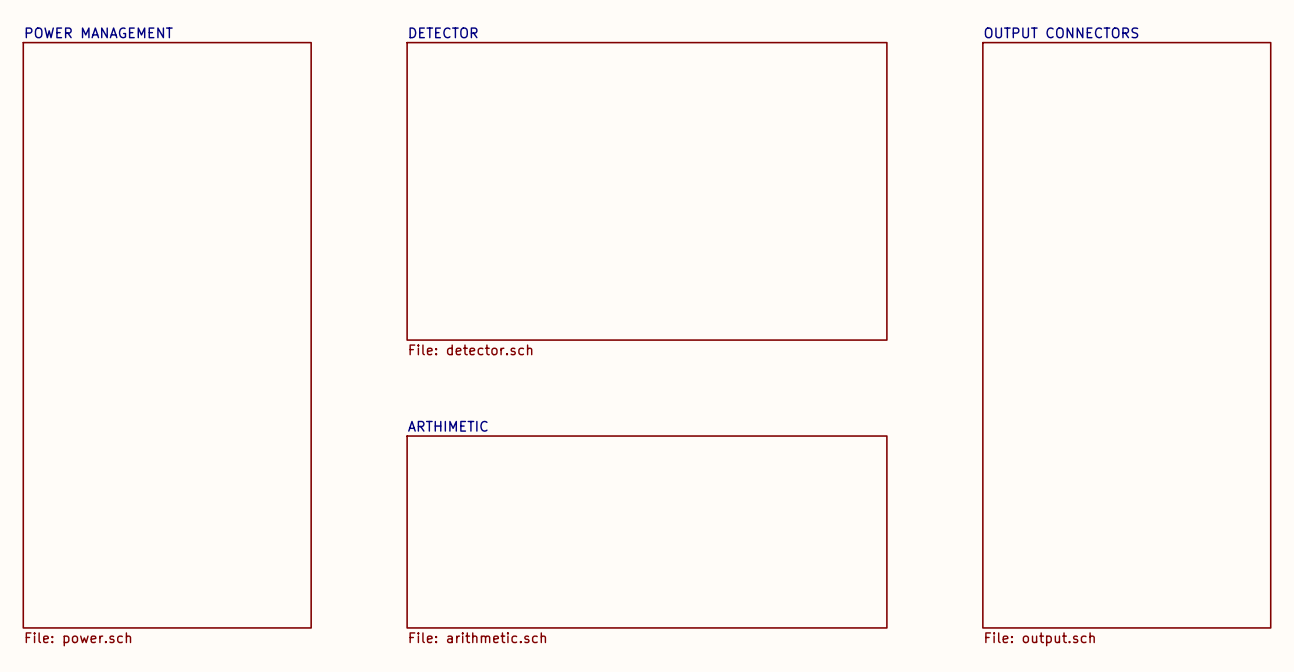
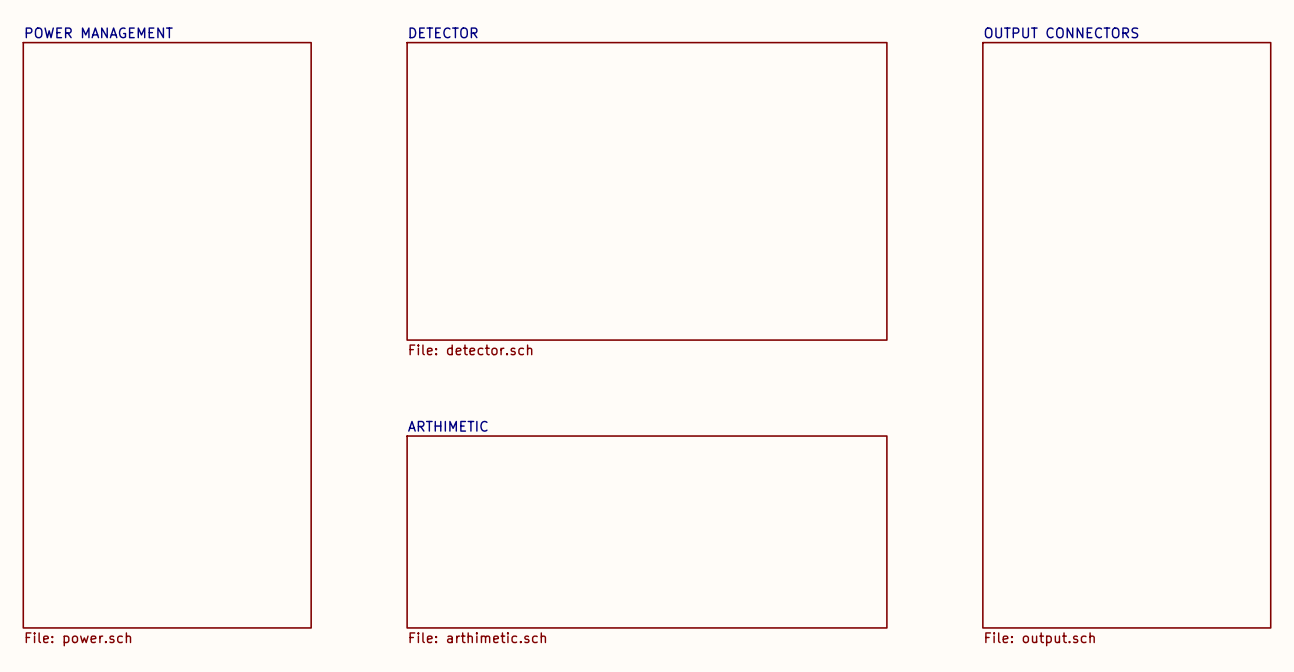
sheet ARTHIMETIC value: File: arithmetic.sch (477, 637) -> File: arthimetic.sch (477, 637)

